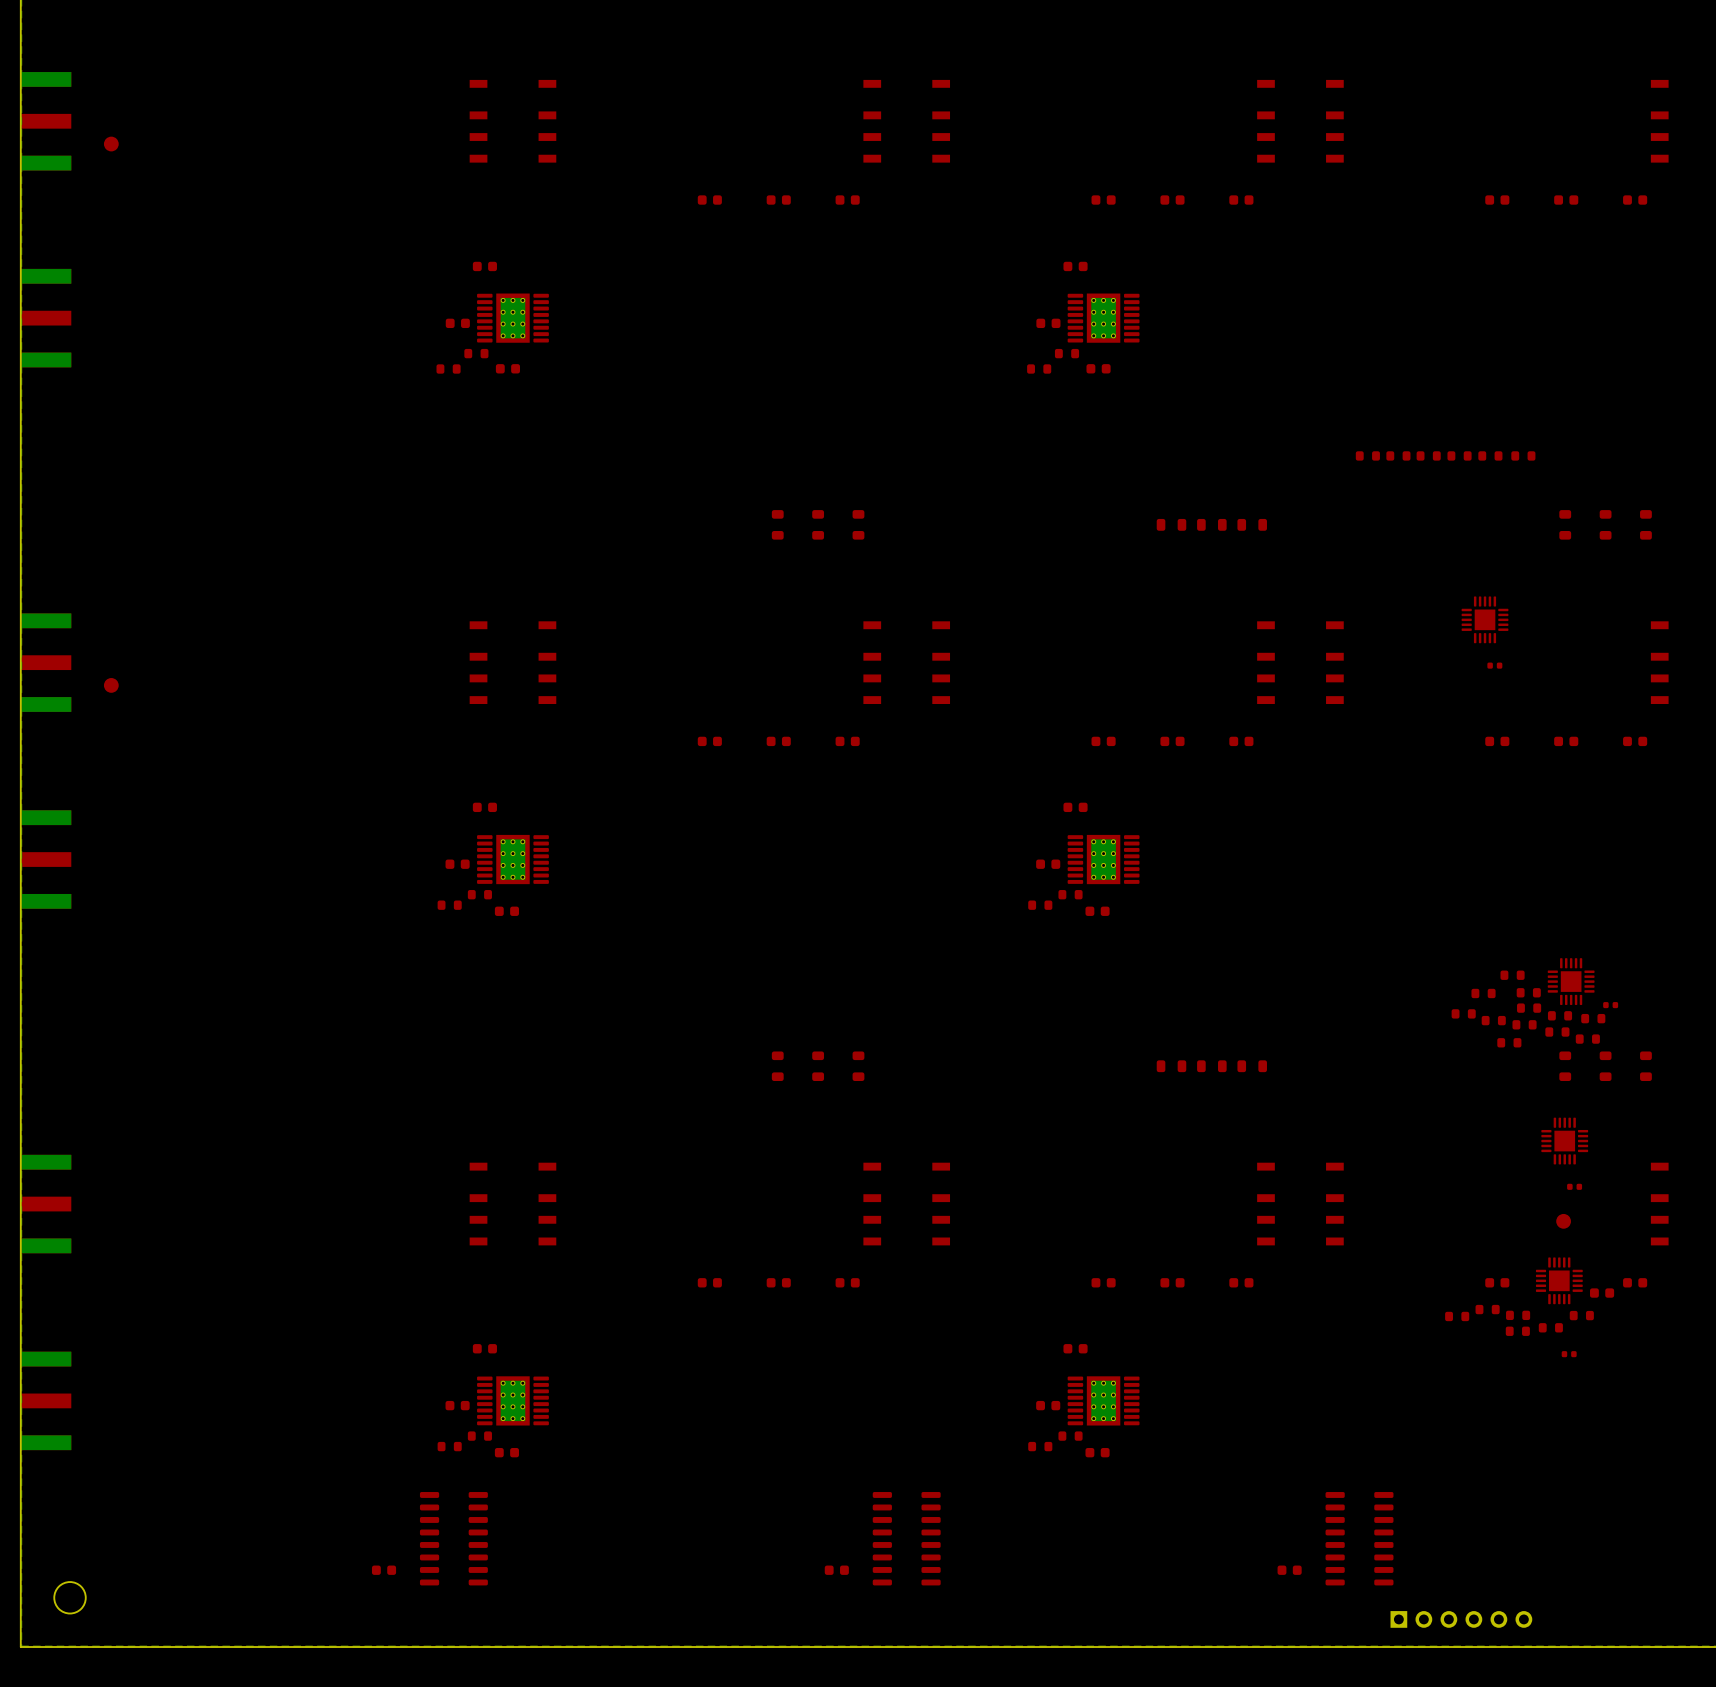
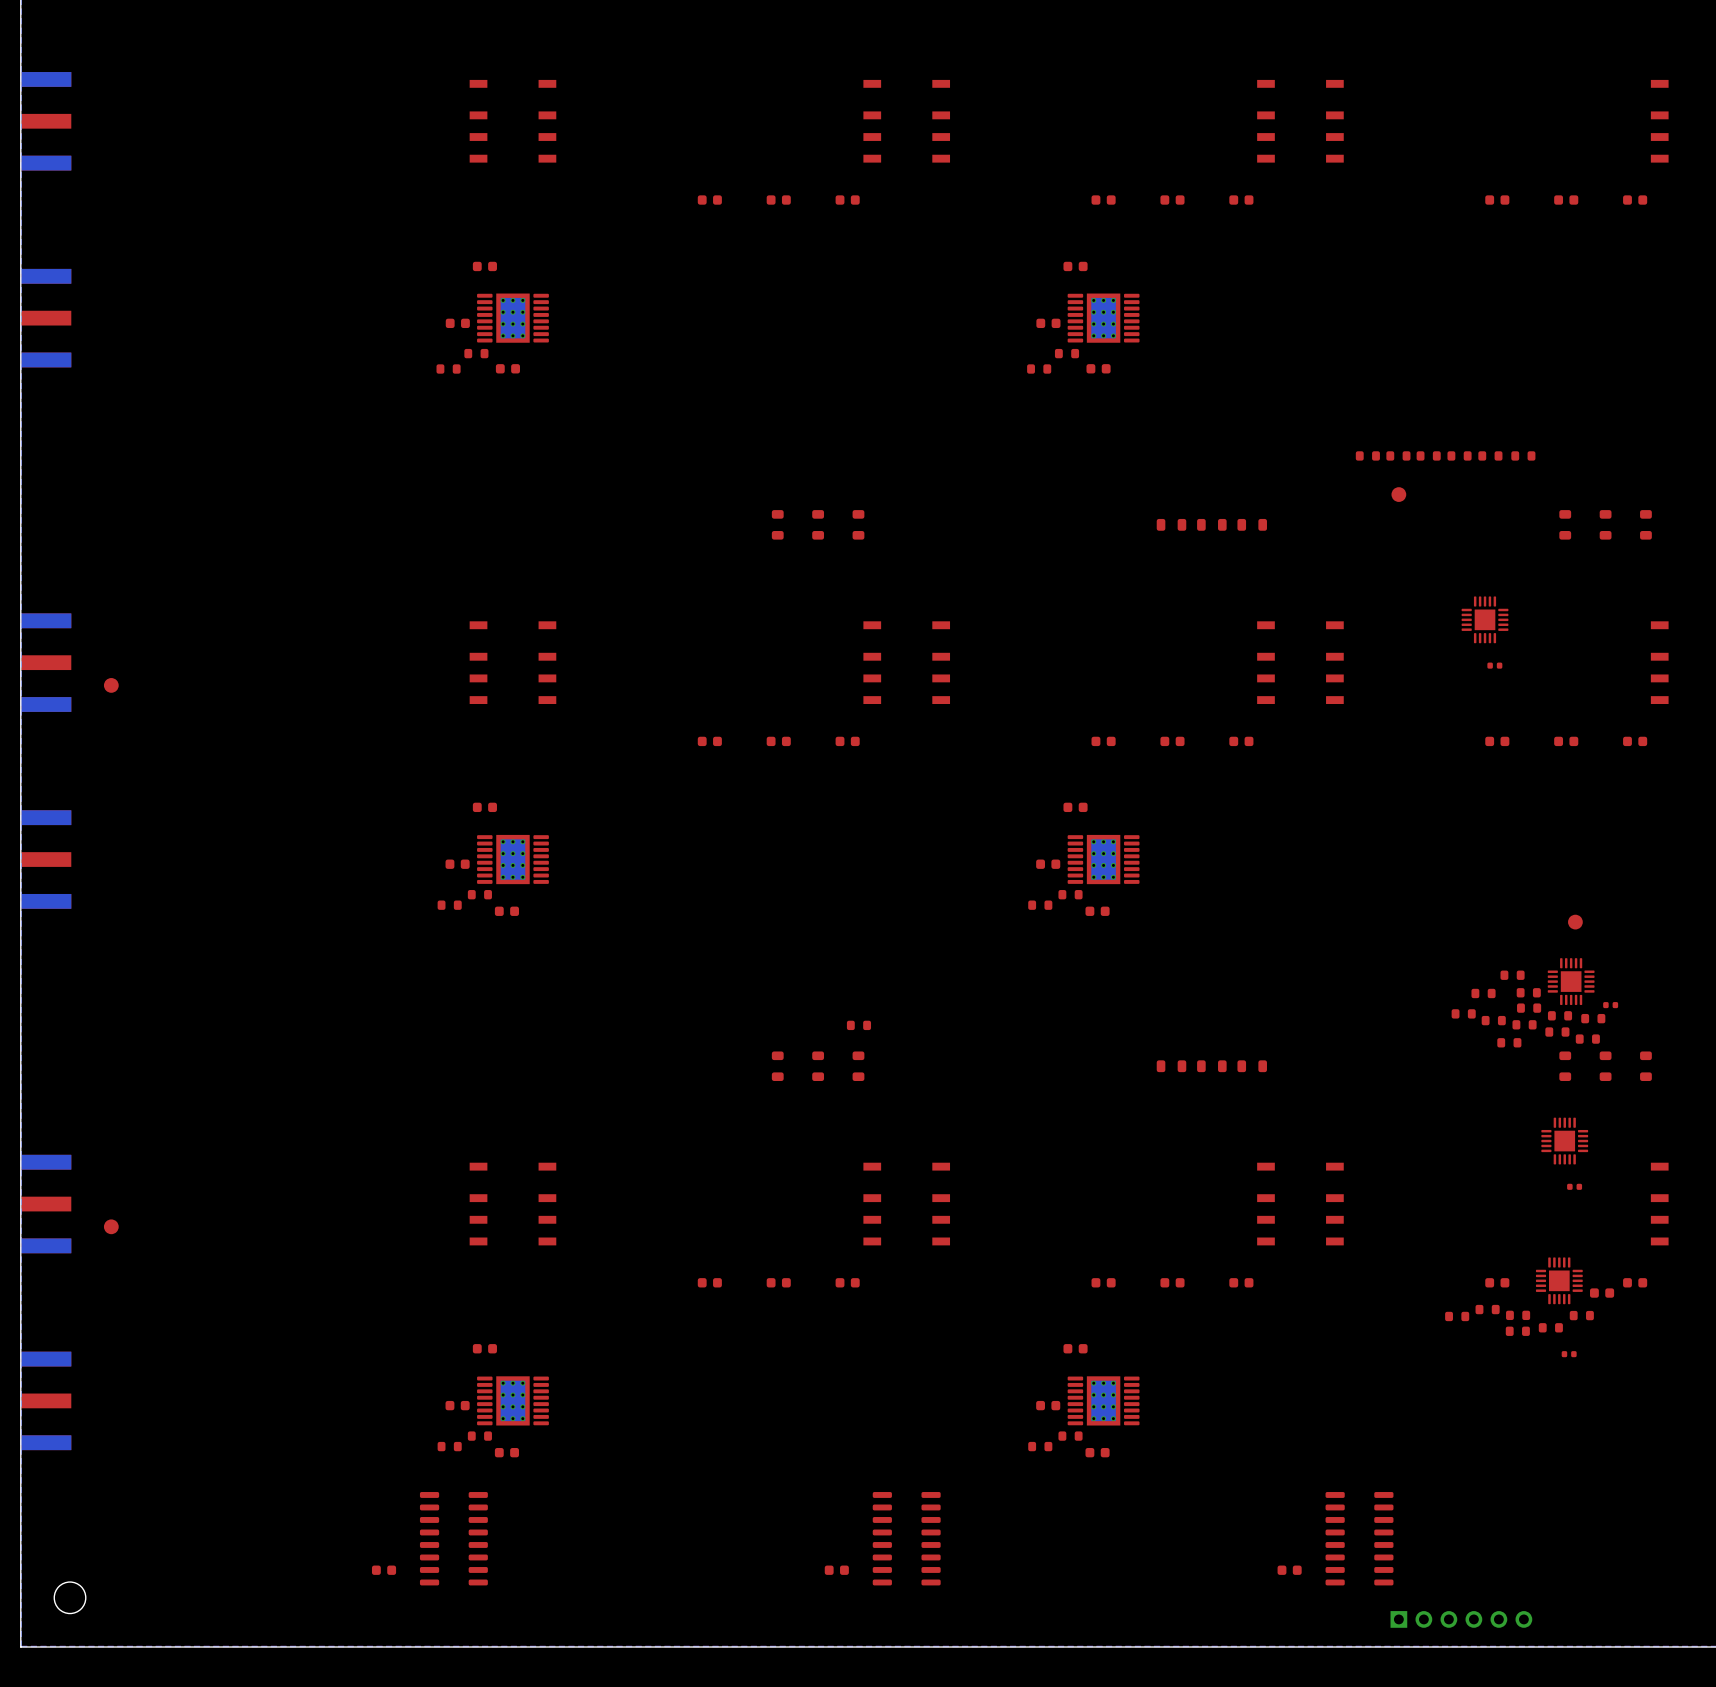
part: (111, 144) -> none
part: none -> (1398, 494)
part: none -> (1575, 922)
part: none -> (858, 1025)
part: (1563, 1221) -> none
part: none -> (111, 1226)

